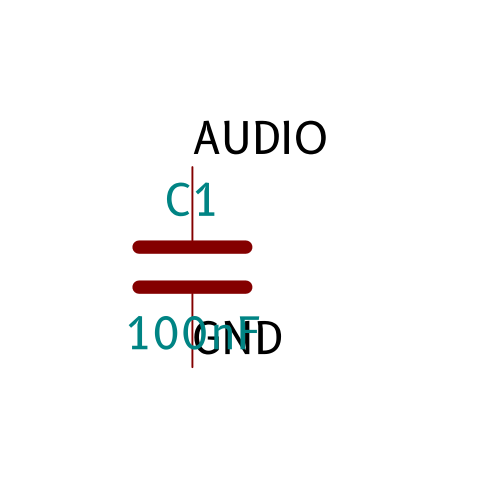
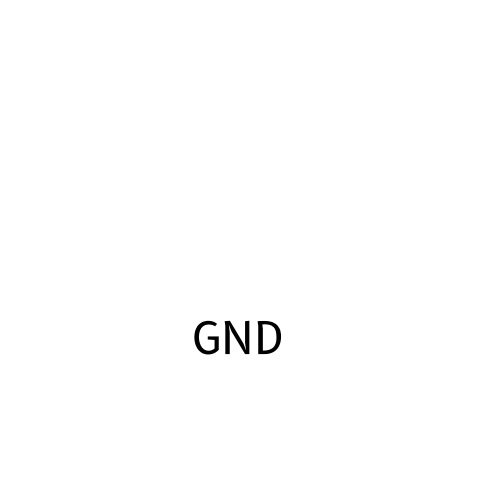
label: AUDIO (259, 137) -> none
C1: 100nF (192, 267) -> none

